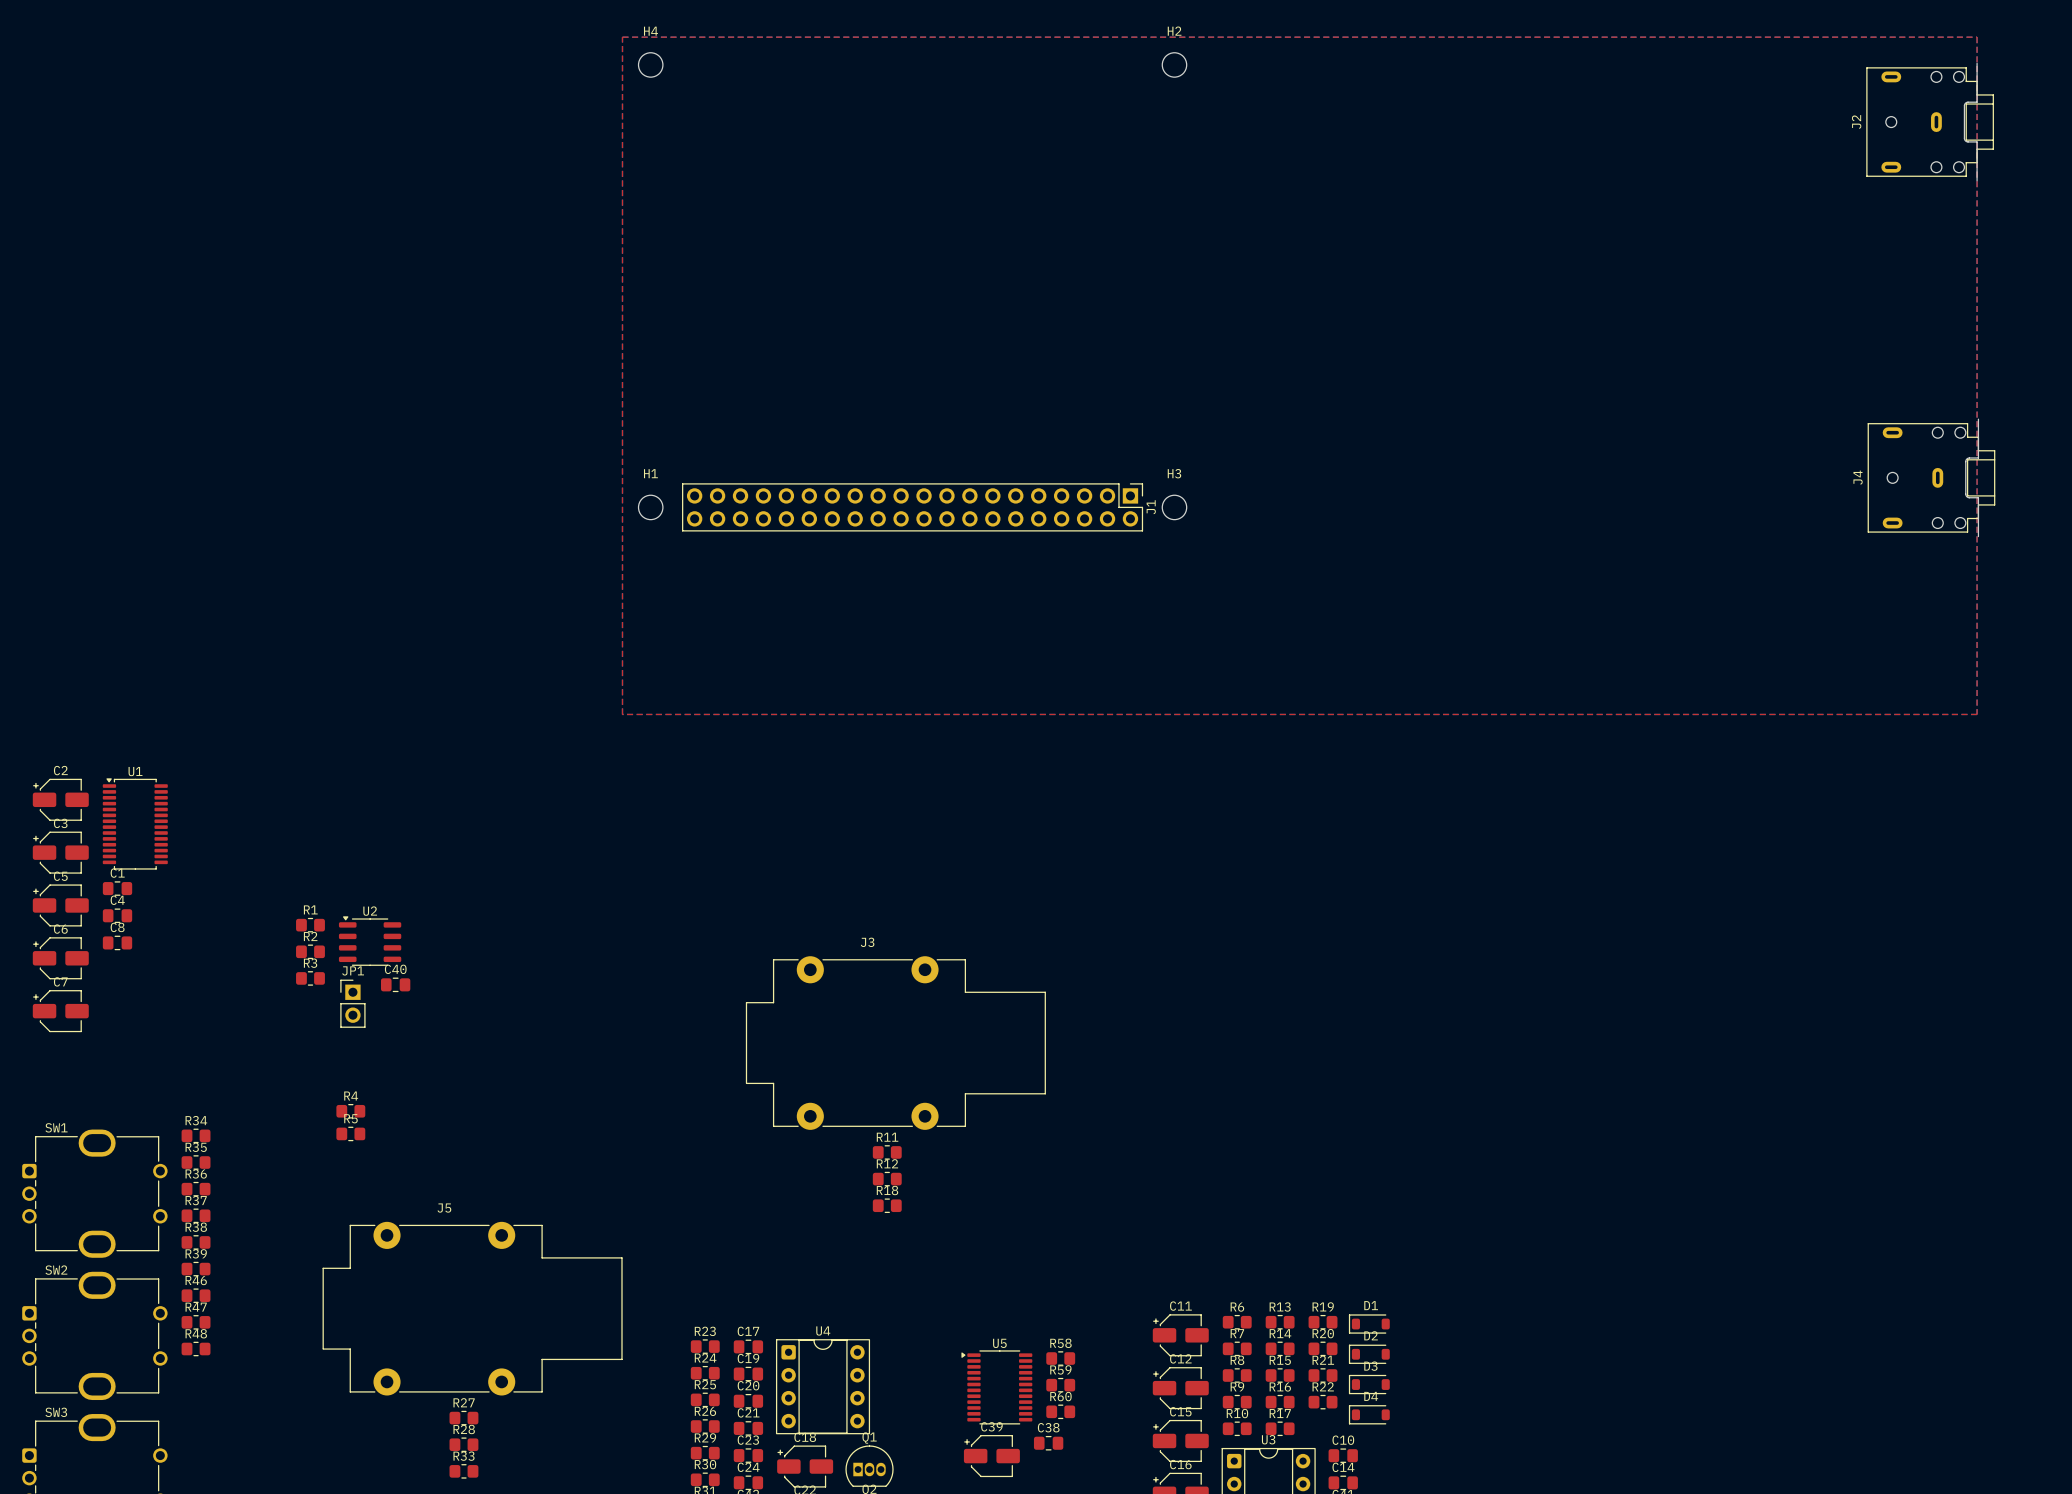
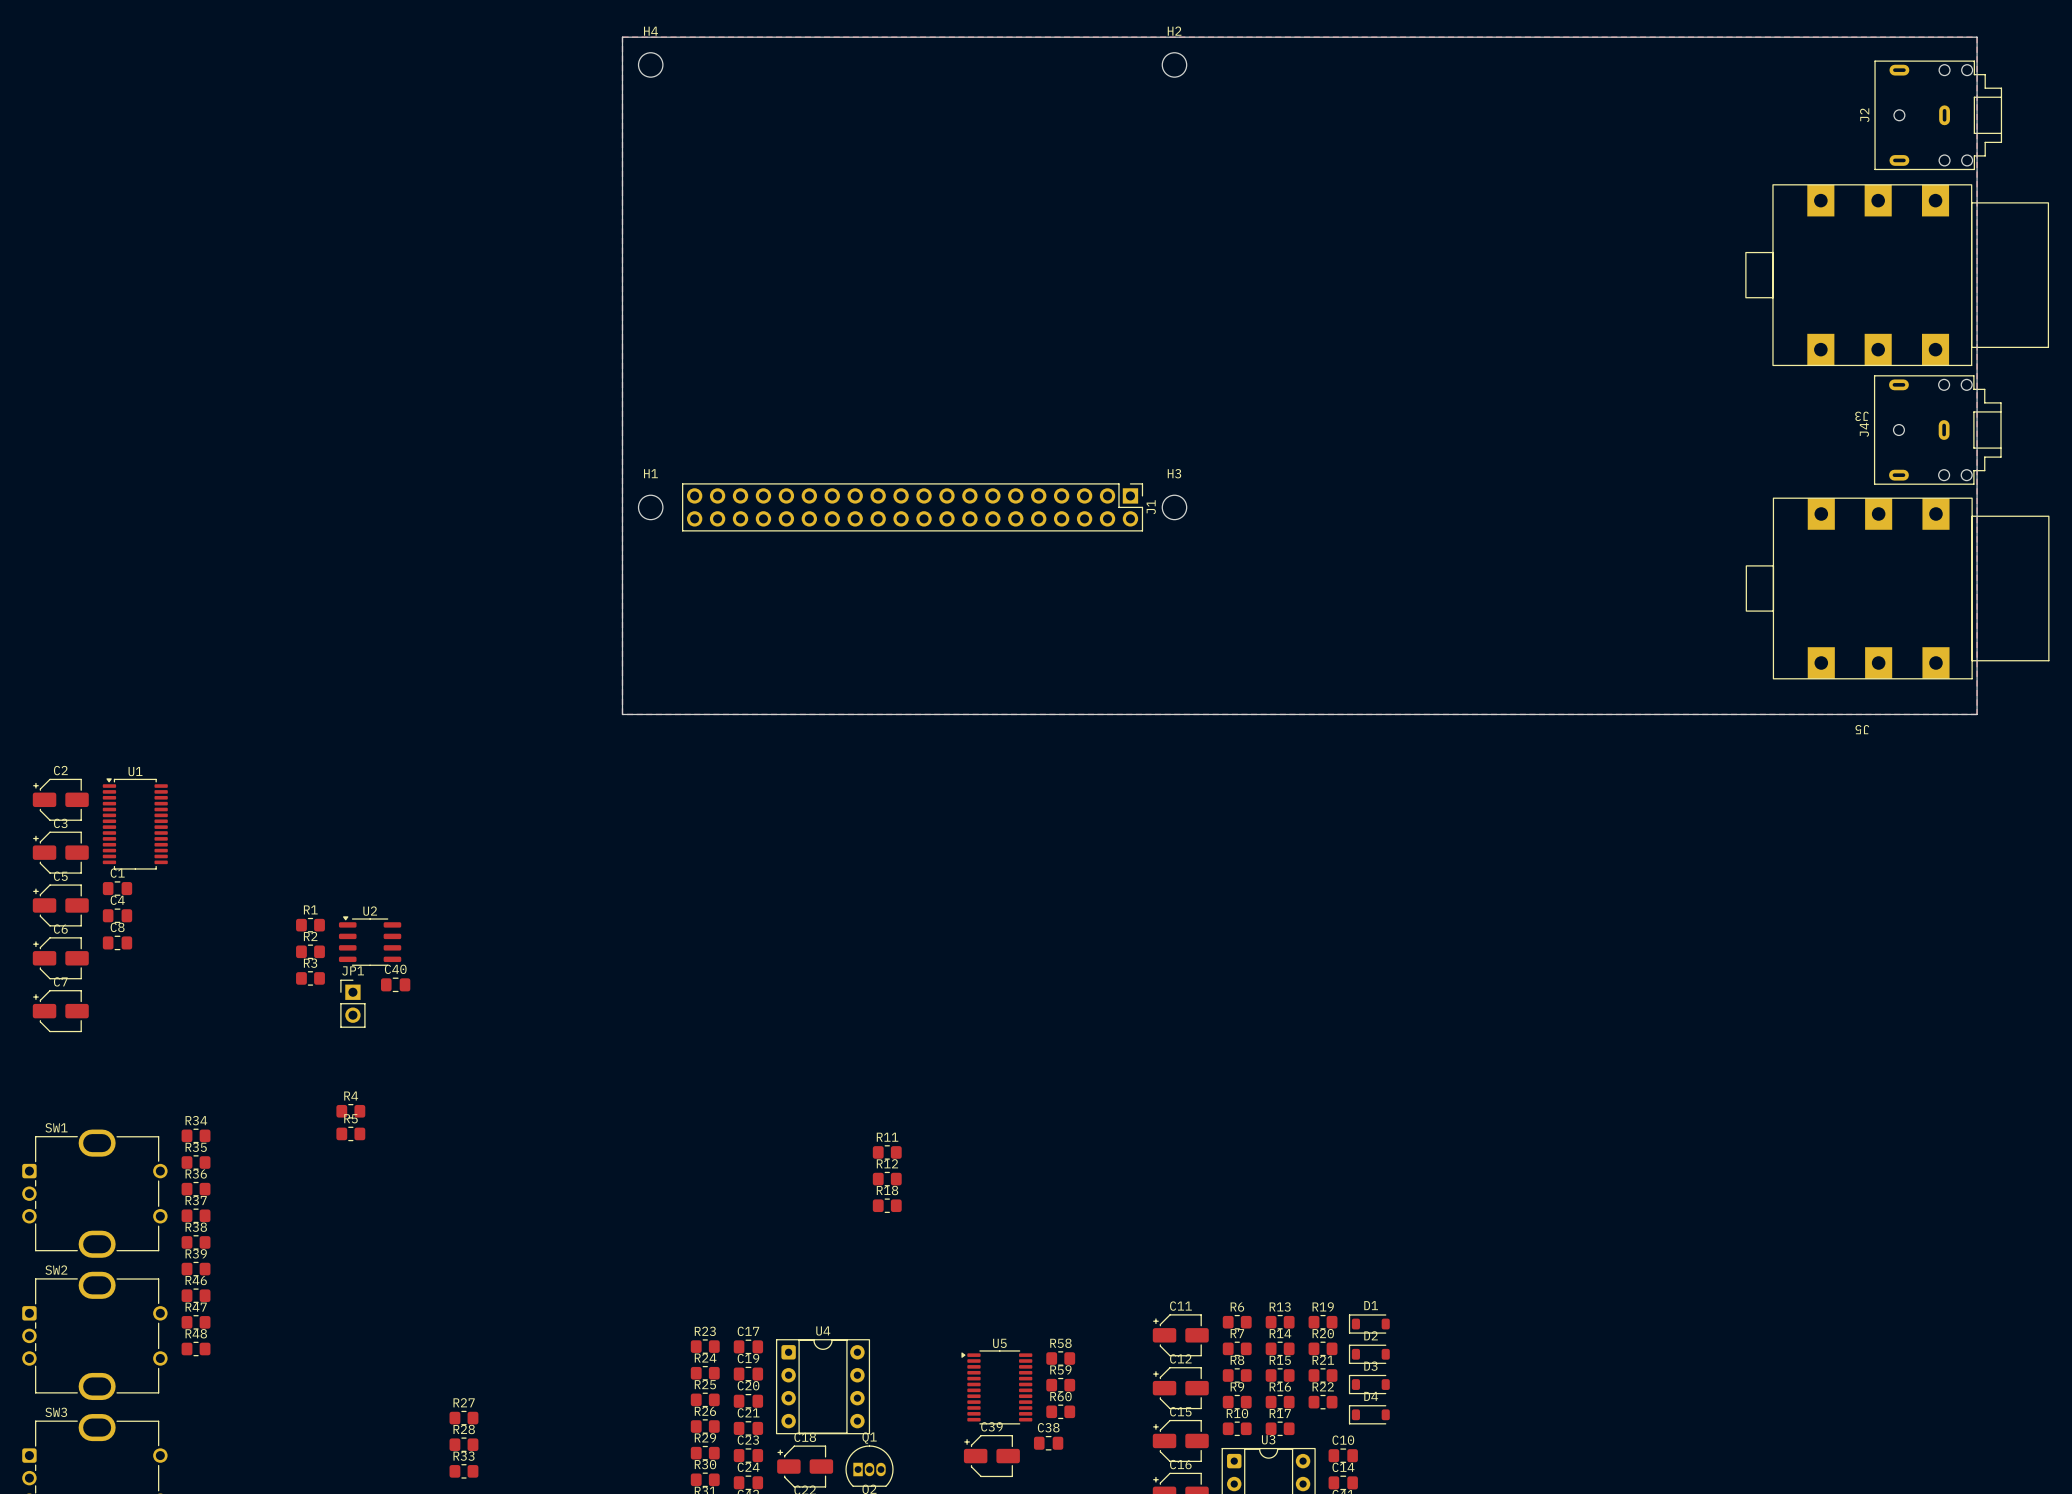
board edge: none -> (622, 37) (1977, 37) (1977, 714) (622, 714) (622, 37)
J2 footprint: [1866, 62, 1994, 182] -> [1874, 60, 2002, 171]
J4 footprint: [1867, 418, 1996, 538] -> [1874, 375, 2002, 485]
J3 name position: J3 (867, 942) -> J3 (1861, 416)
J3 footprint: [745, 956, 1046, 1130] -> [1745, 184, 2049, 366]
J5 name position: J5 (444, 1208) -> J5 (1862, 729)
J5 footprint: [322, 1221, 623, 1396] -> [1745, 497, 2050, 680]

